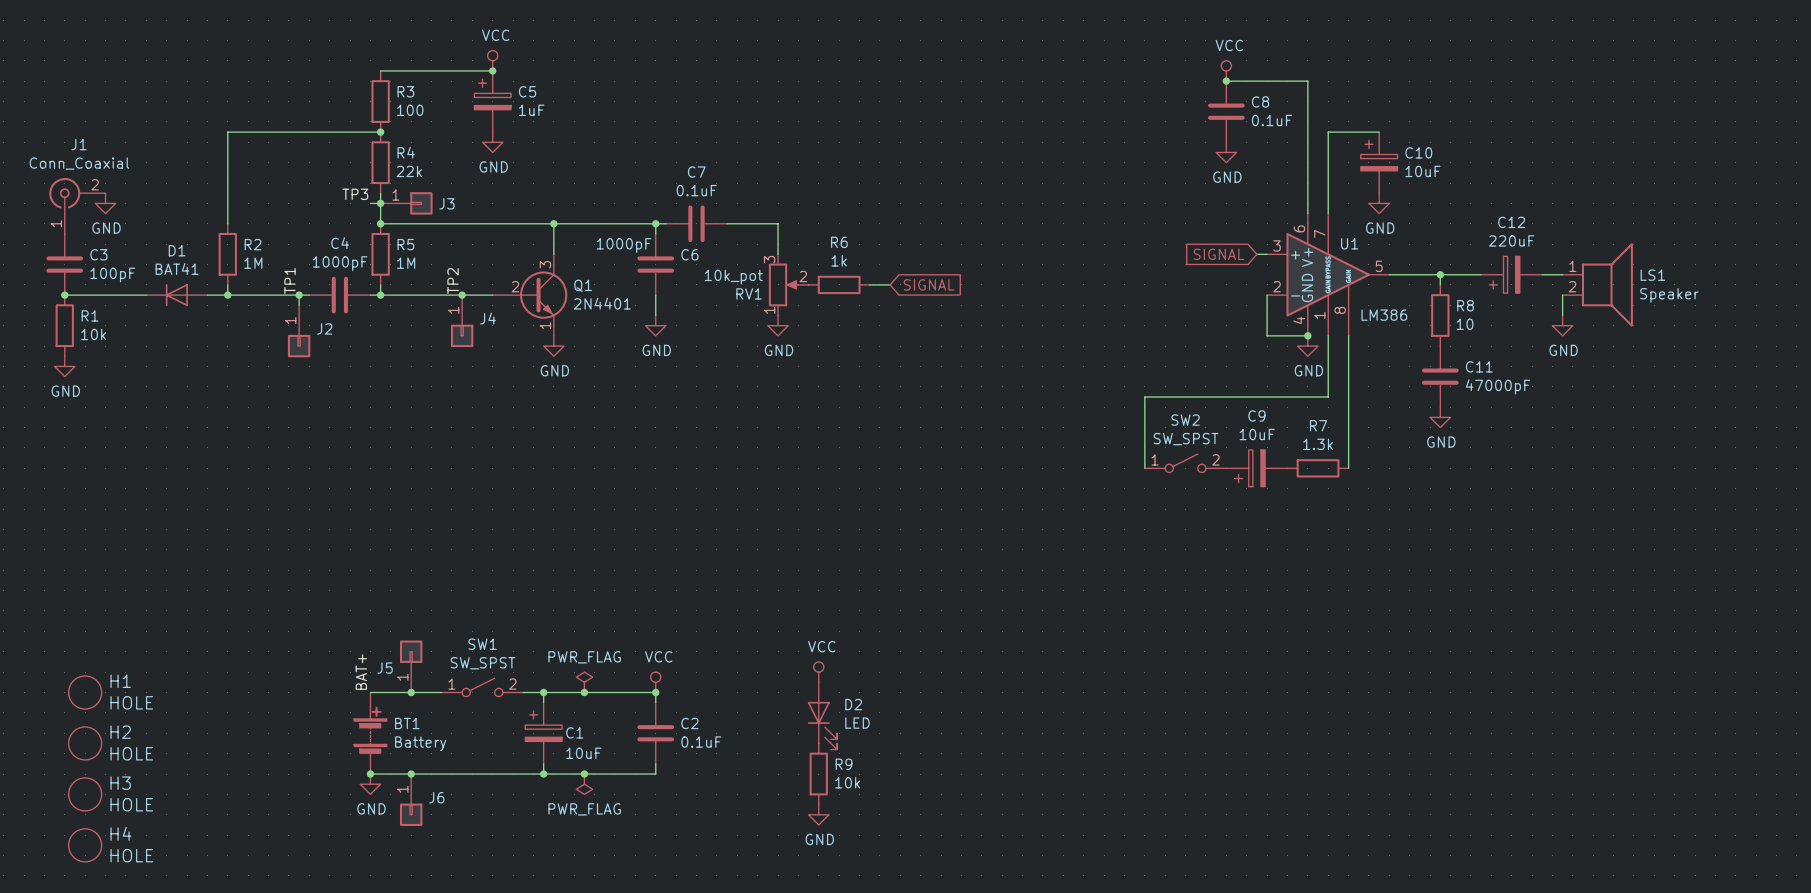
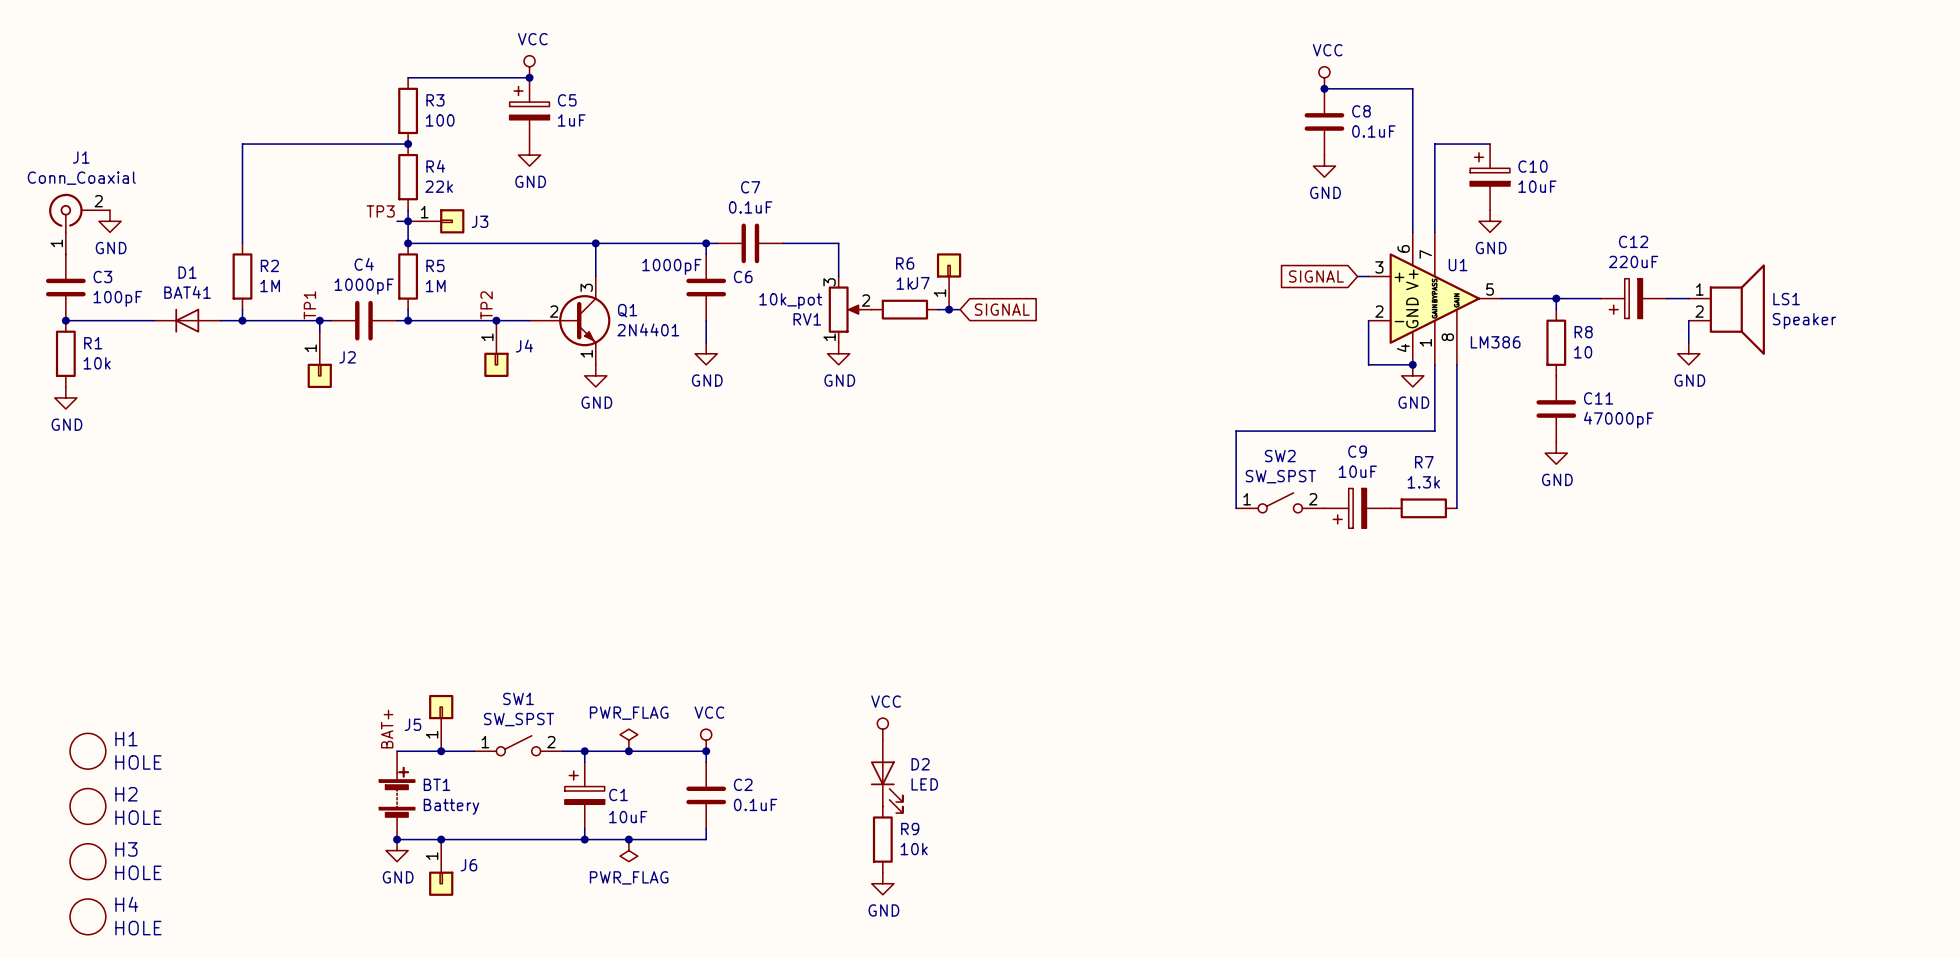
J7: none -> (949, 281)
junction: none -> (949, 309)

